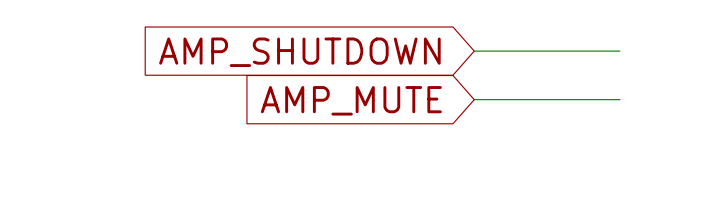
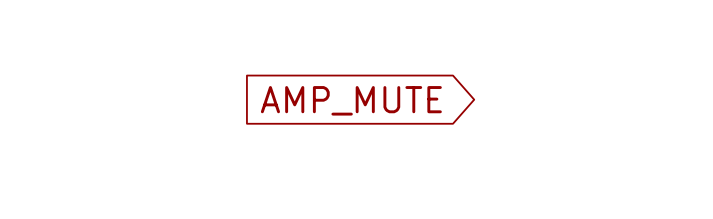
wire: (474, 51) (619, 51) -> none
global label: AMP_SHUTDOWN (299, 52) -> none
wire: (474, 99) (619, 99) -> none

